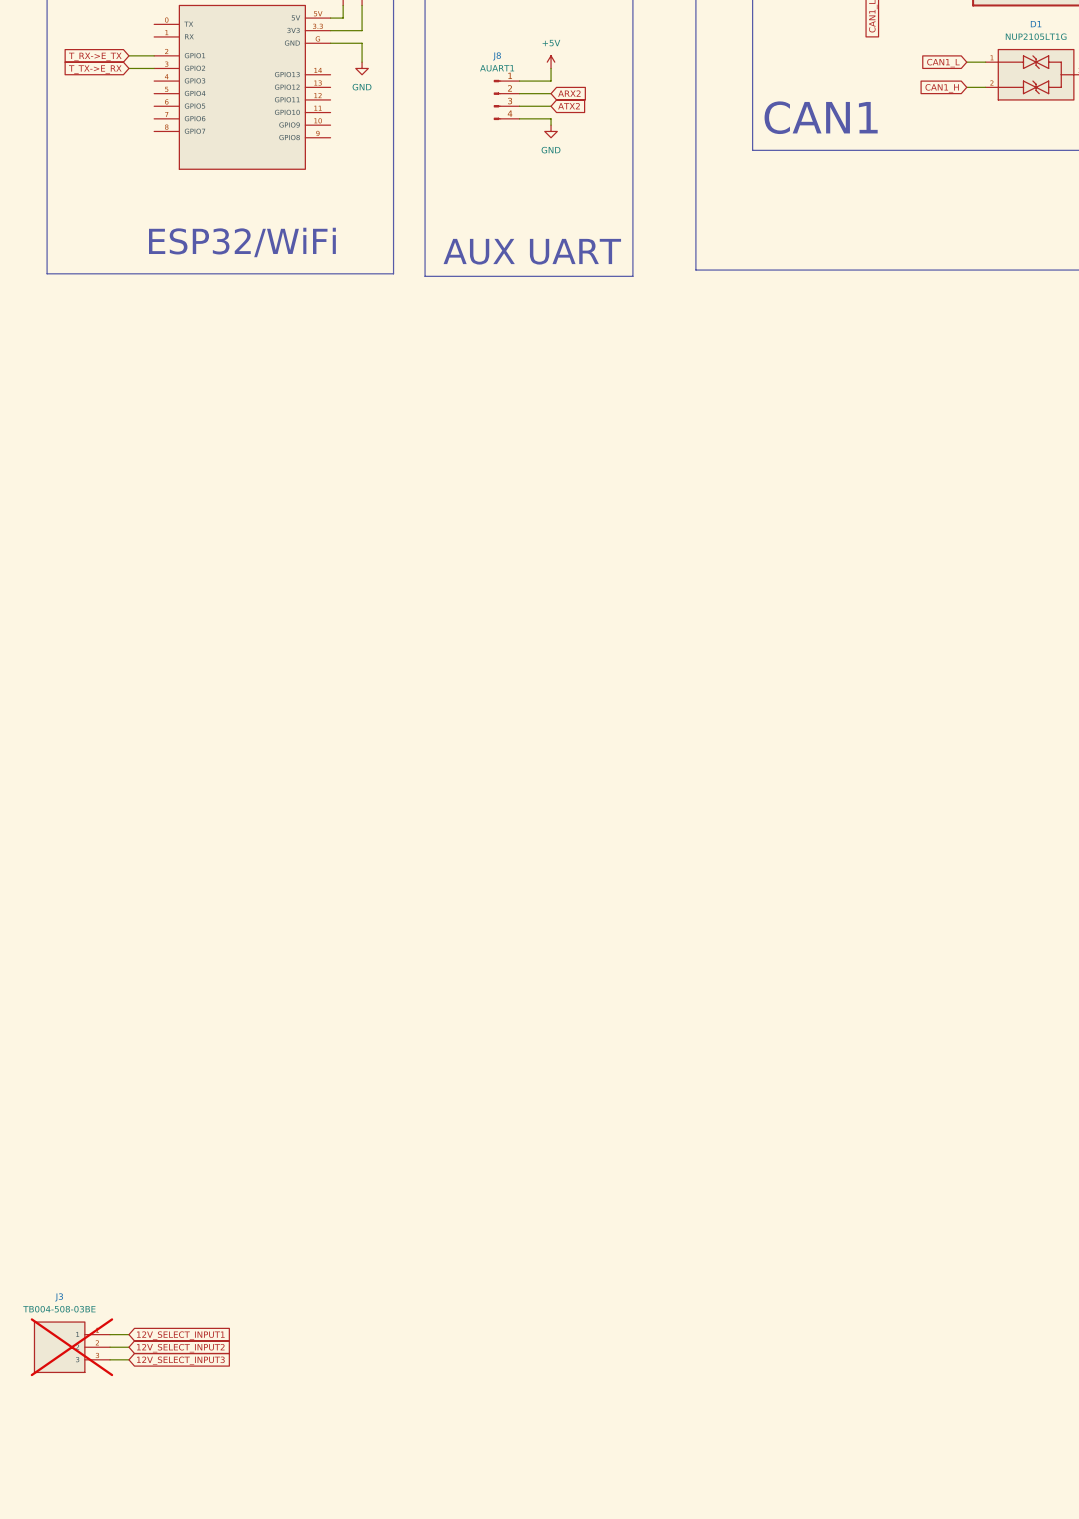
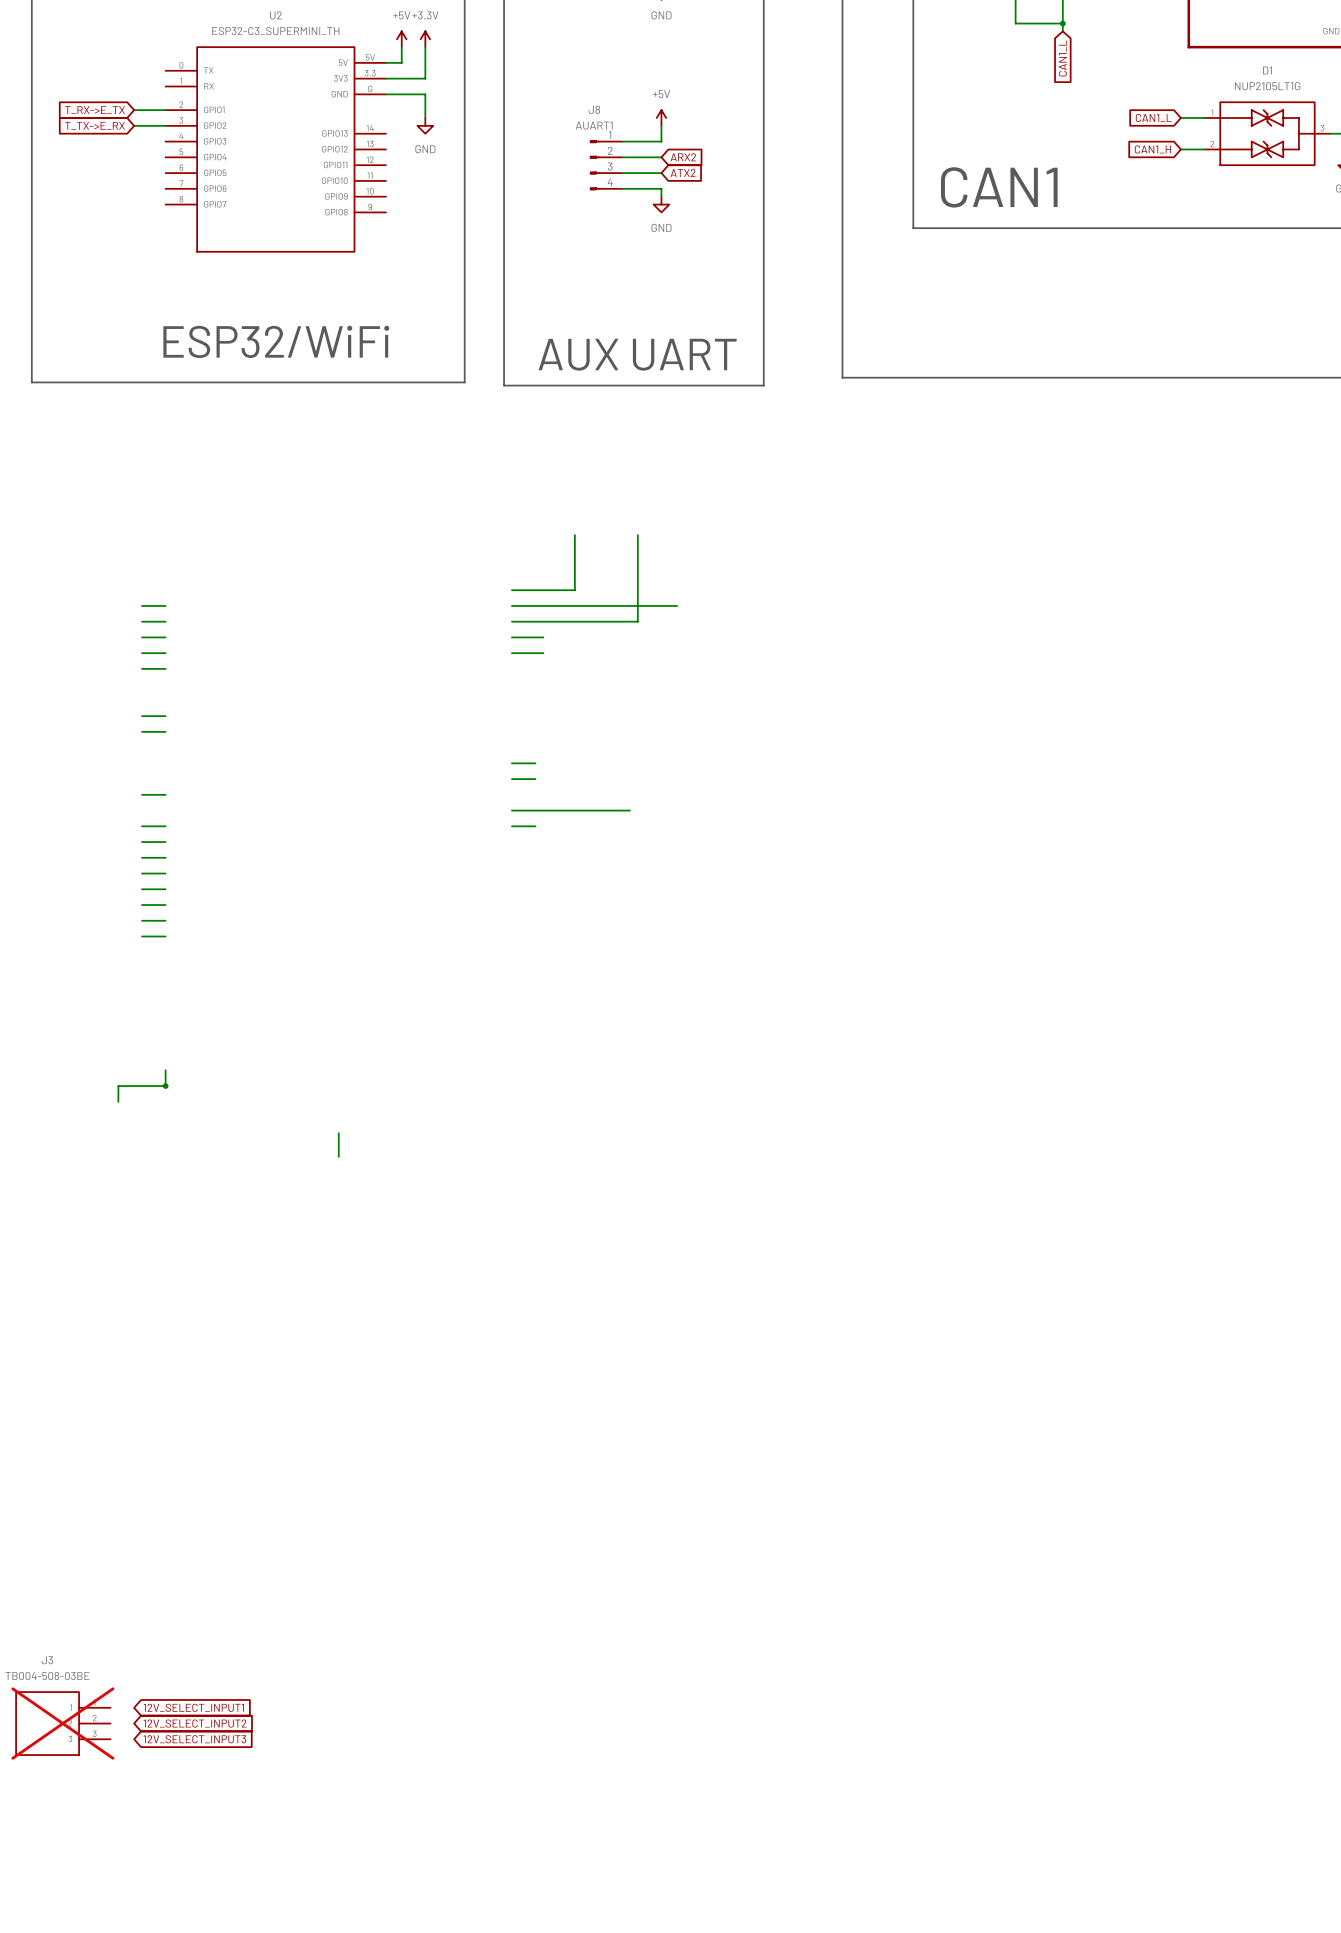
wire: none -> (574, 535) (574, 590) (511, 590)
wire: none -> (637, 535) (637, 621) (511, 621)
wire: none -> (142, 605) (165, 605)
wire: none -> (511, 605) (677, 605)
wire: none -> (142, 621) (165, 621)
wire: none -> (142, 637) (165, 637)
wire: none -> (511, 637) (543, 637)
wire: none -> (142, 653) (165, 653)
wire: none -> (511, 653) (543, 653)
wire: none -> (142, 668) (165, 668)
wire: none -> (142, 716) (165, 716)
wire: none -> (142, 731) (165, 731)
wire: none -> (511, 763) (535, 763)
wire: none -> (511, 779) (535, 779)
wire: none -> (142, 794) (165, 794)
wire: none -> (511, 810) (629, 810)
wire: none -> (142, 826) (165, 826)
wire: none -> (511, 826) (535, 826)
wire: none -> (142, 842) (165, 842)
wire: none -> (142, 857) (165, 857)
wire: none -> (142, 873) (165, 873)
wire: none -> (142, 889) (165, 889)
wire: none -> (142, 905) (165, 905)
wire: none -> (142, 920) (165, 920)
wire: none -> (142, 936) (165, 936)
wire: none -> (165, 1070) (165, 1086) (118, 1086) (118, 1101)
junction: none -> (165, 1086)
wire: none -> (338, 1133) (338, 1156)
wire: (110, 1334) (128, 1334) -> none
wire: (110, 1347) (128, 1347) -> none
wire: (110, 1359) (128, 1359) -> none

